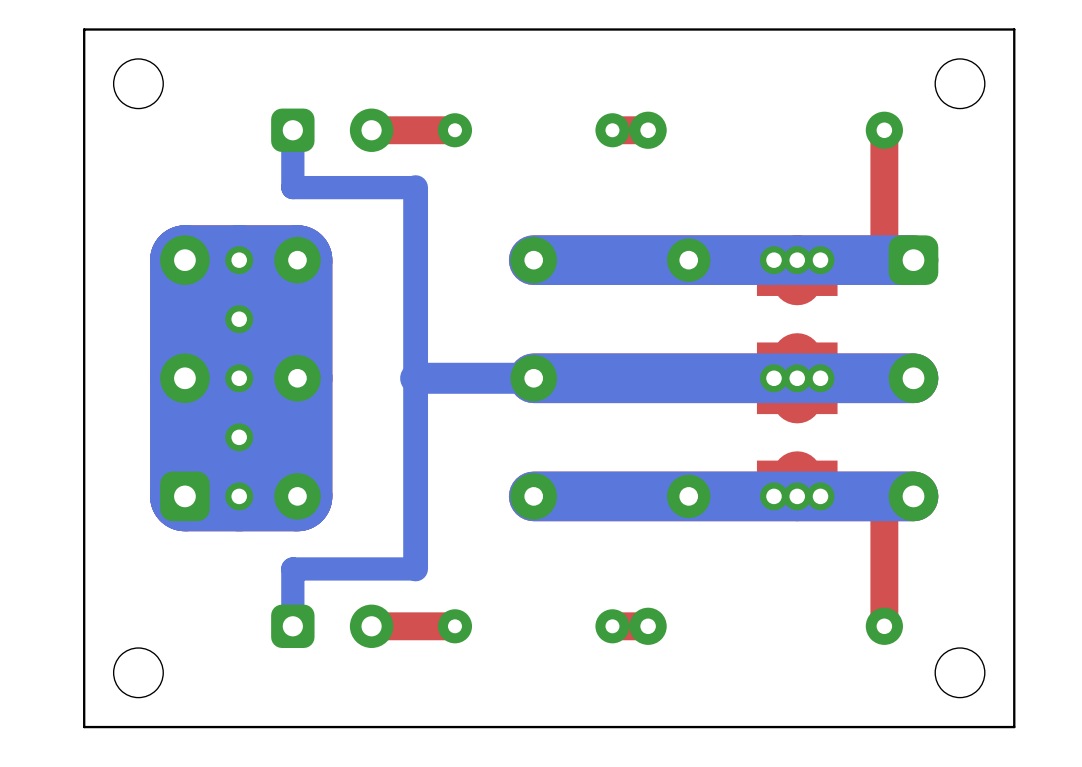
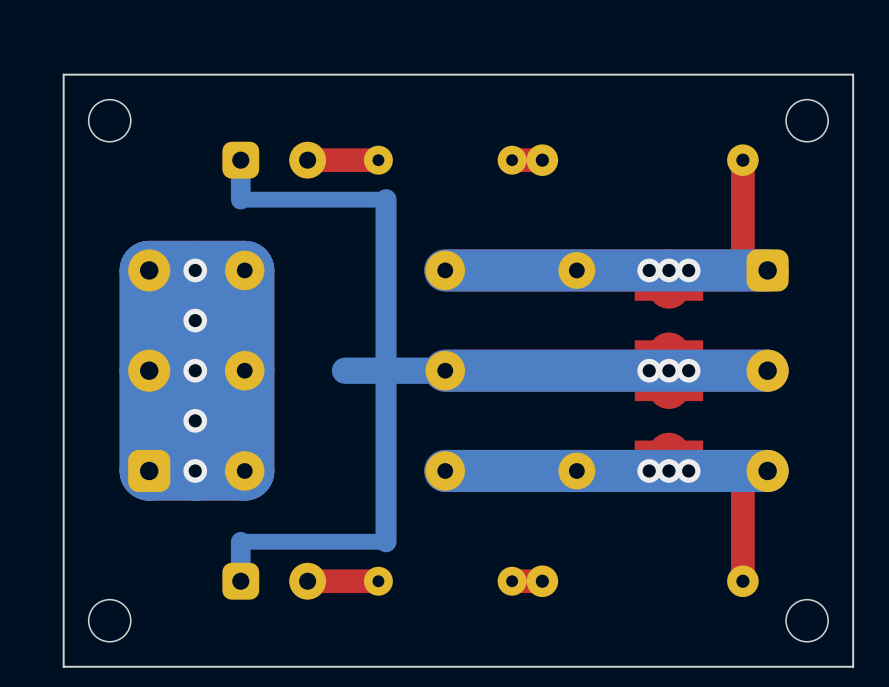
bottom track: (292, 176) (292, 187) (415, 187) (415, 568) (292, 568) (292, 579) -> (240, 199) (386, 199) (386, 541) (240, 541)

